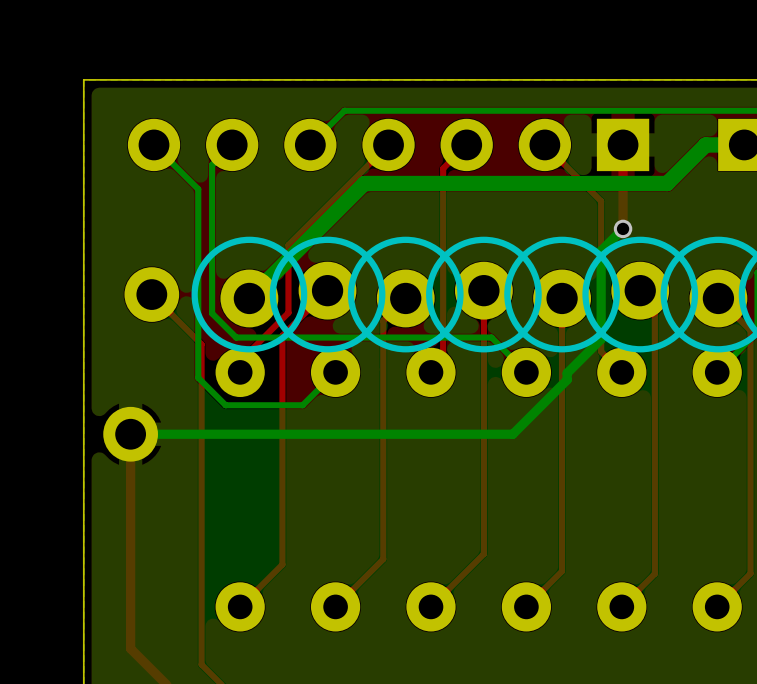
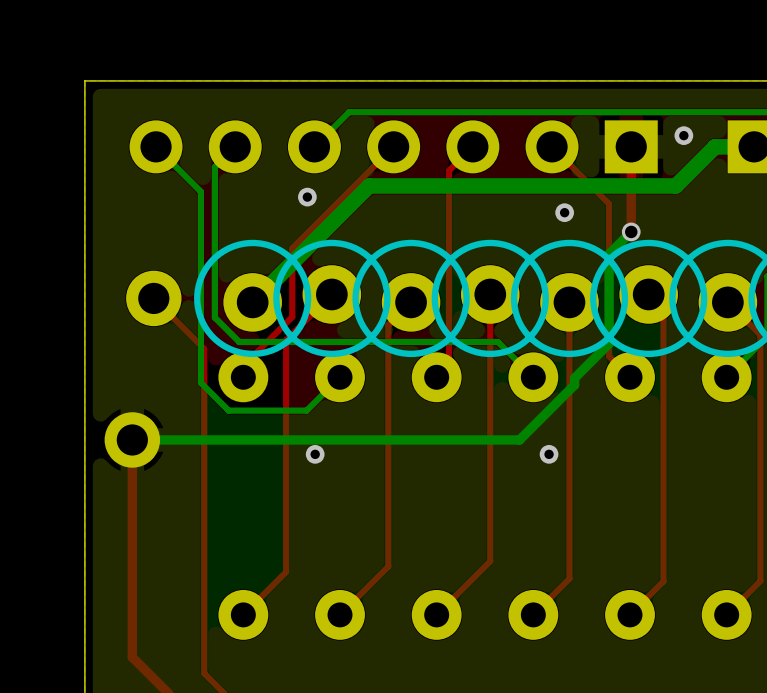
via: none -> (683, 135)
via: none -> (307, 197)
via: none -> (564, 212)
via: none -> (315, 454)
via: none -> (549, 454)

